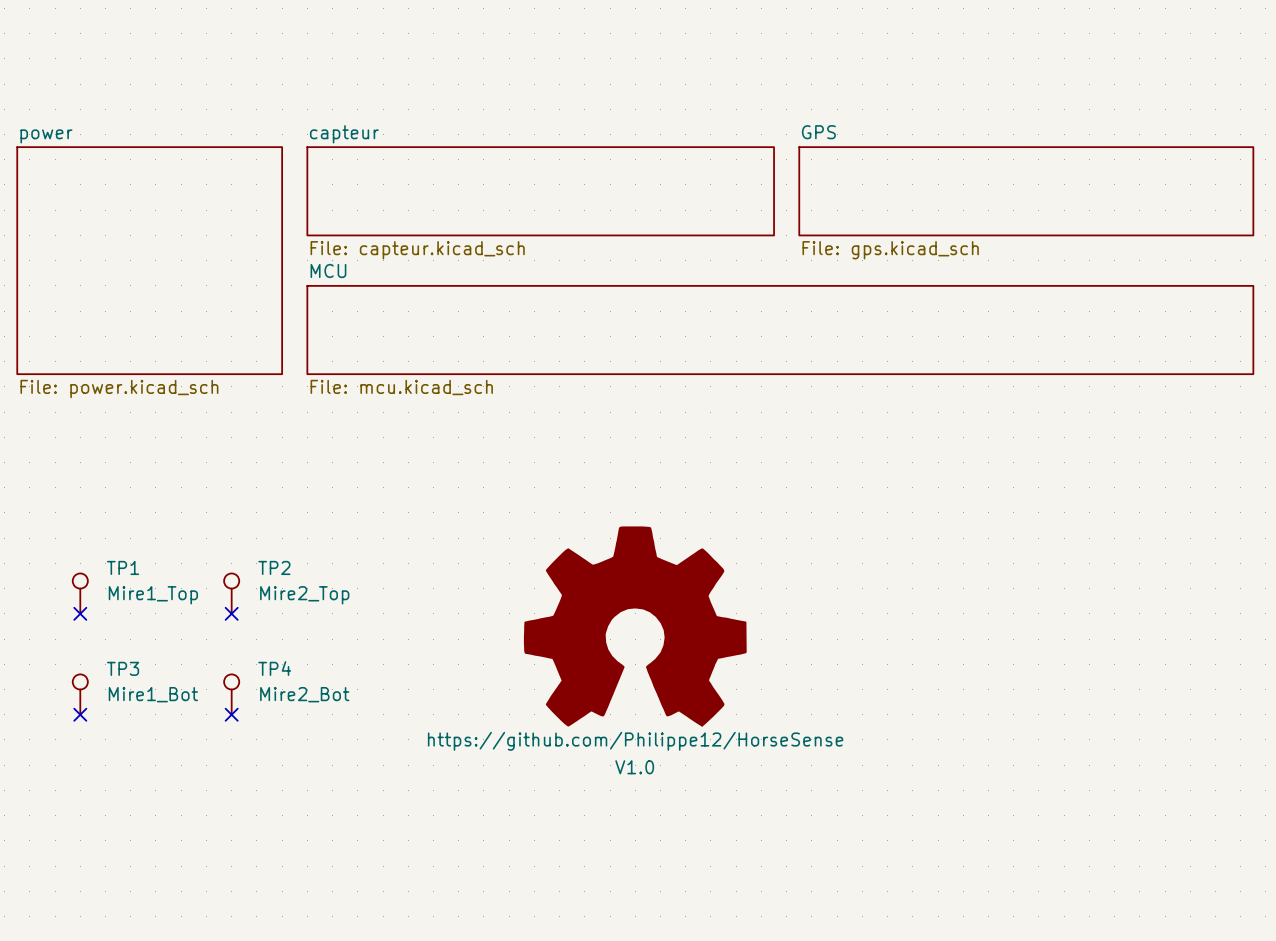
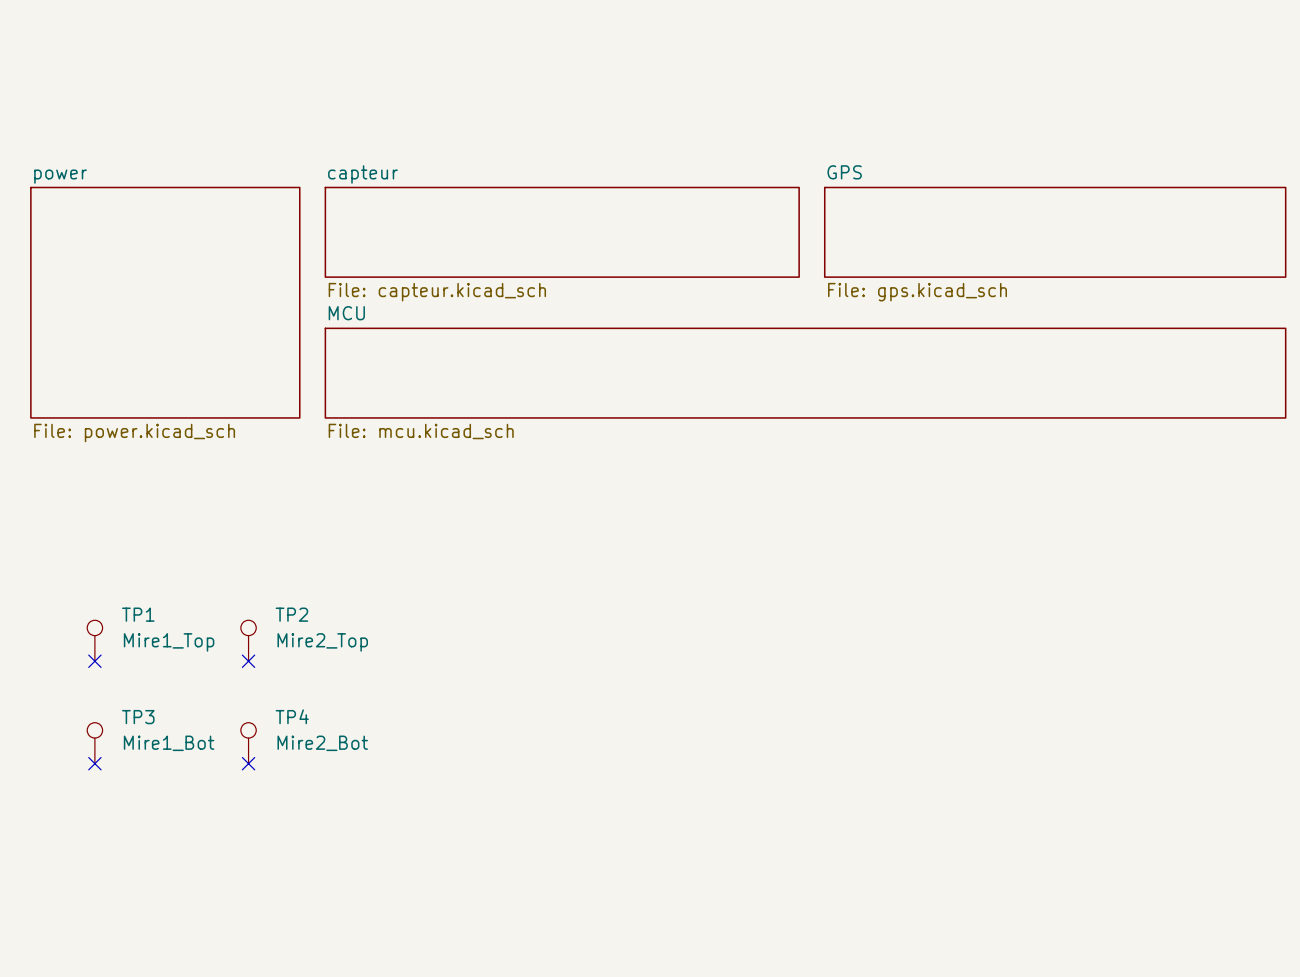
part: https://github.com/Philippe12/HorseSense (635, 626) -> none

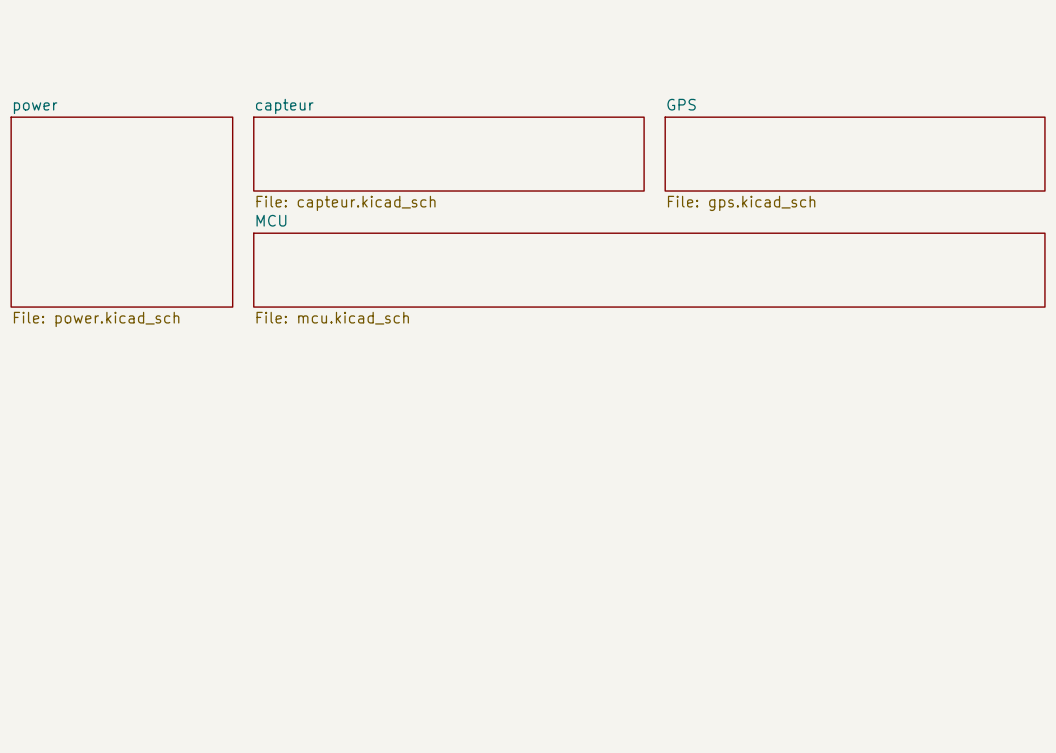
TP1: Mire1_Top (94, 640) -> none
TP2: Mire2_Top (248, 640) -> none
no-connect mark: (94, 661) -> none
no-connect mark: (248, 661) -> none
TP3: Mire1_Bot (94, 743) -> none
TP4: Mire2_Bot (248, 743) -> none
no-connect mark: (94, 763) -> none
no-connect mark: (248, 763) -> none

